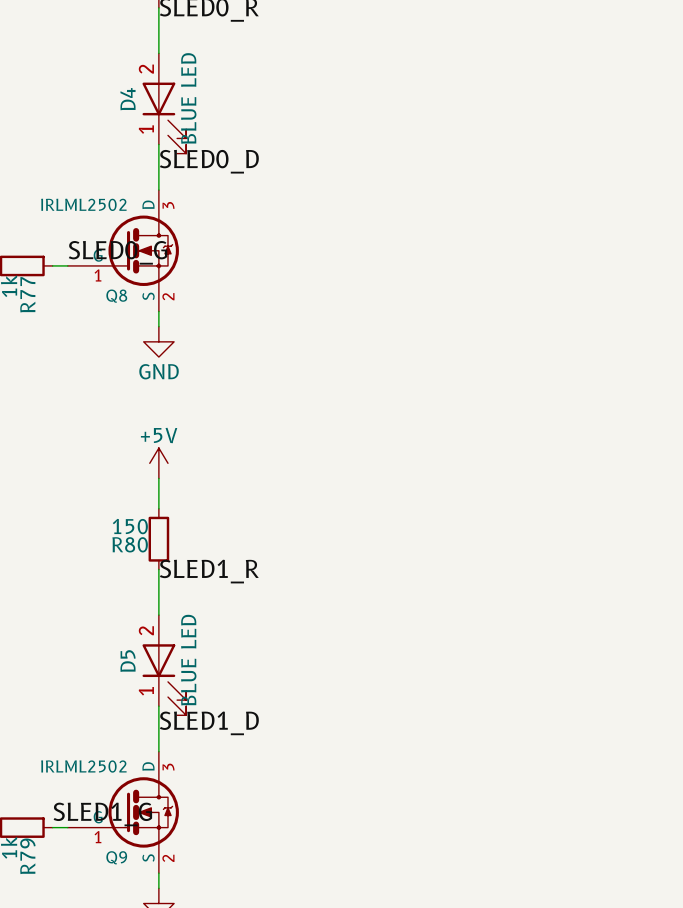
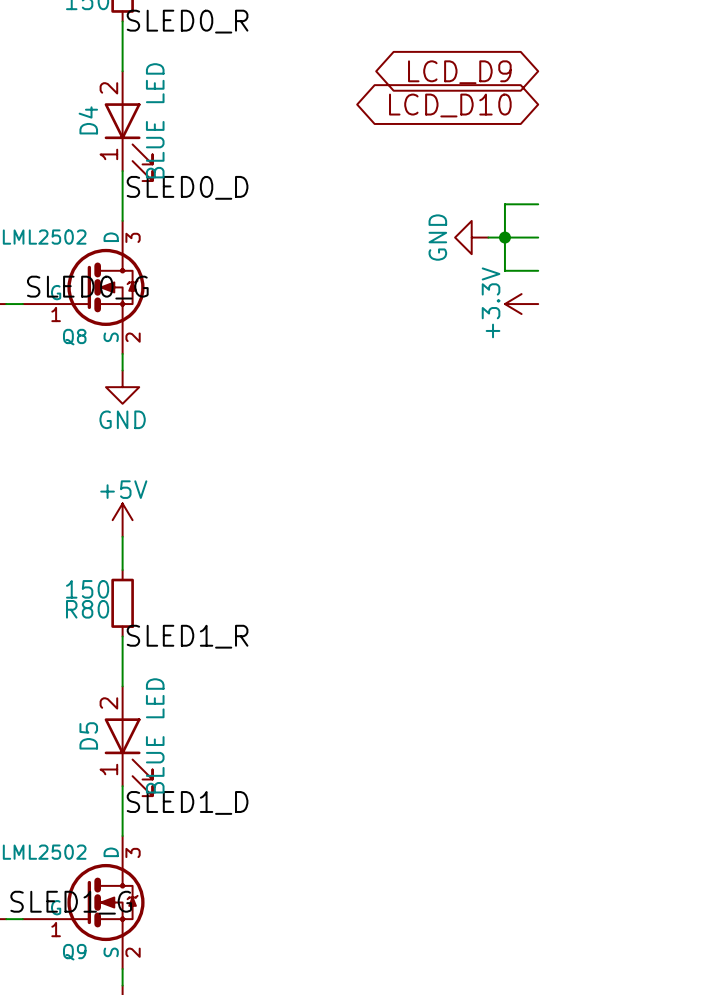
global label: none -> LCD_D9 (459, 72)
global label: none -> LCD_D10 (450, 105)
wire: none -> (538, 204) (504, 204) (504, 270) (538, 270)
power symbol: none -> GND (471, 237)
wire: none -> (488, 237) (538, 237)
junction: none -> (504, 237)
power symbol: none -> +3.3V (521, 304)

